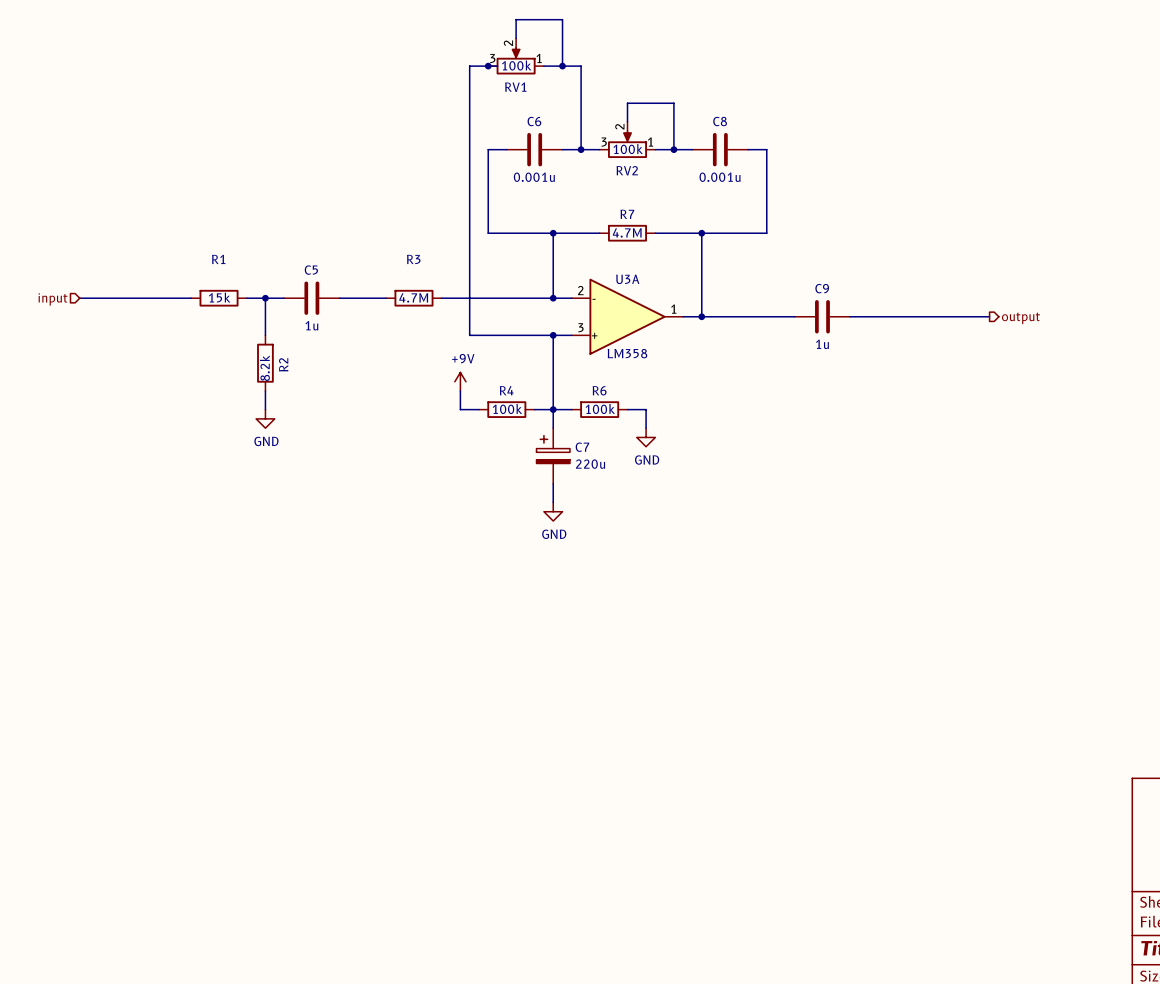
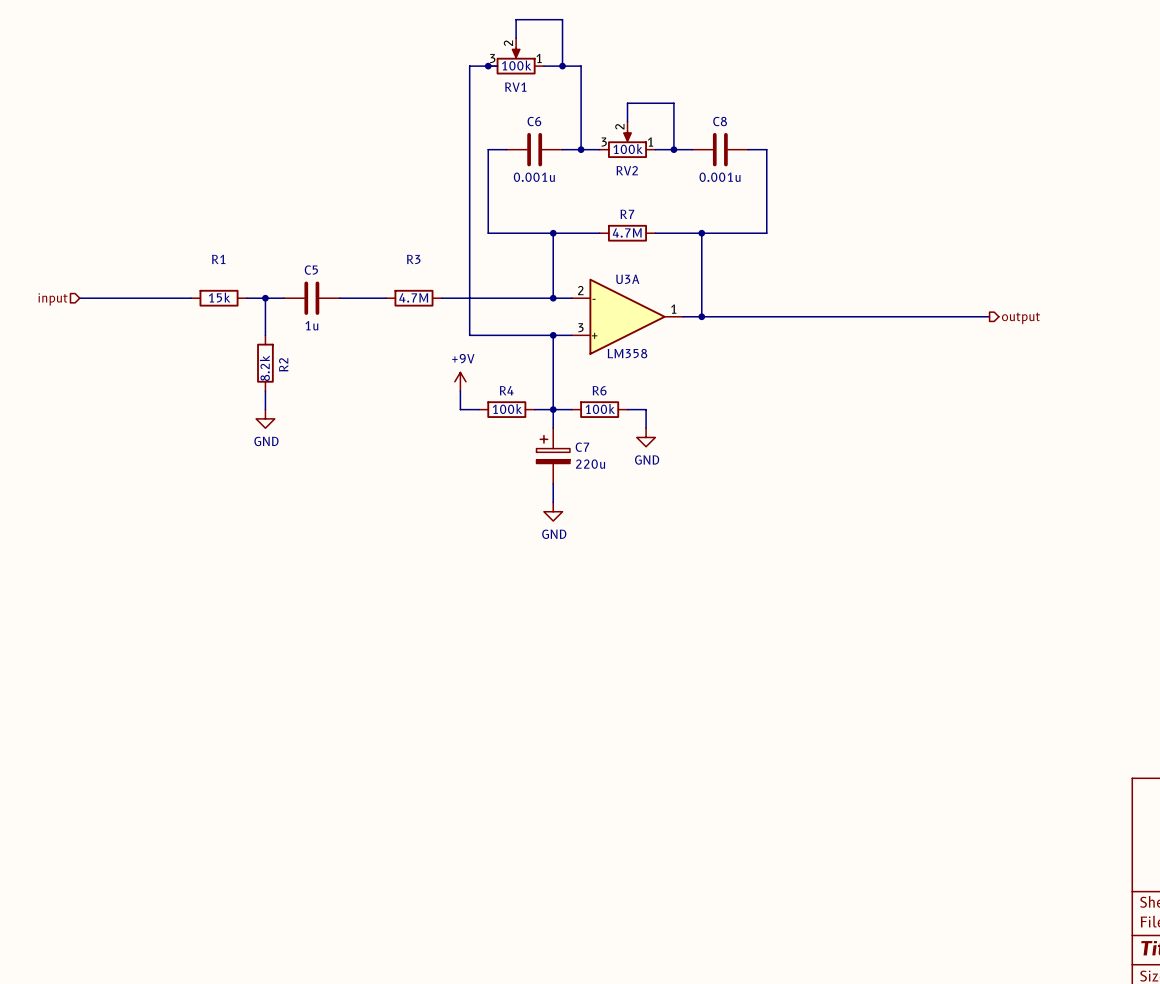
C9: 1u (822, 316) -> none

